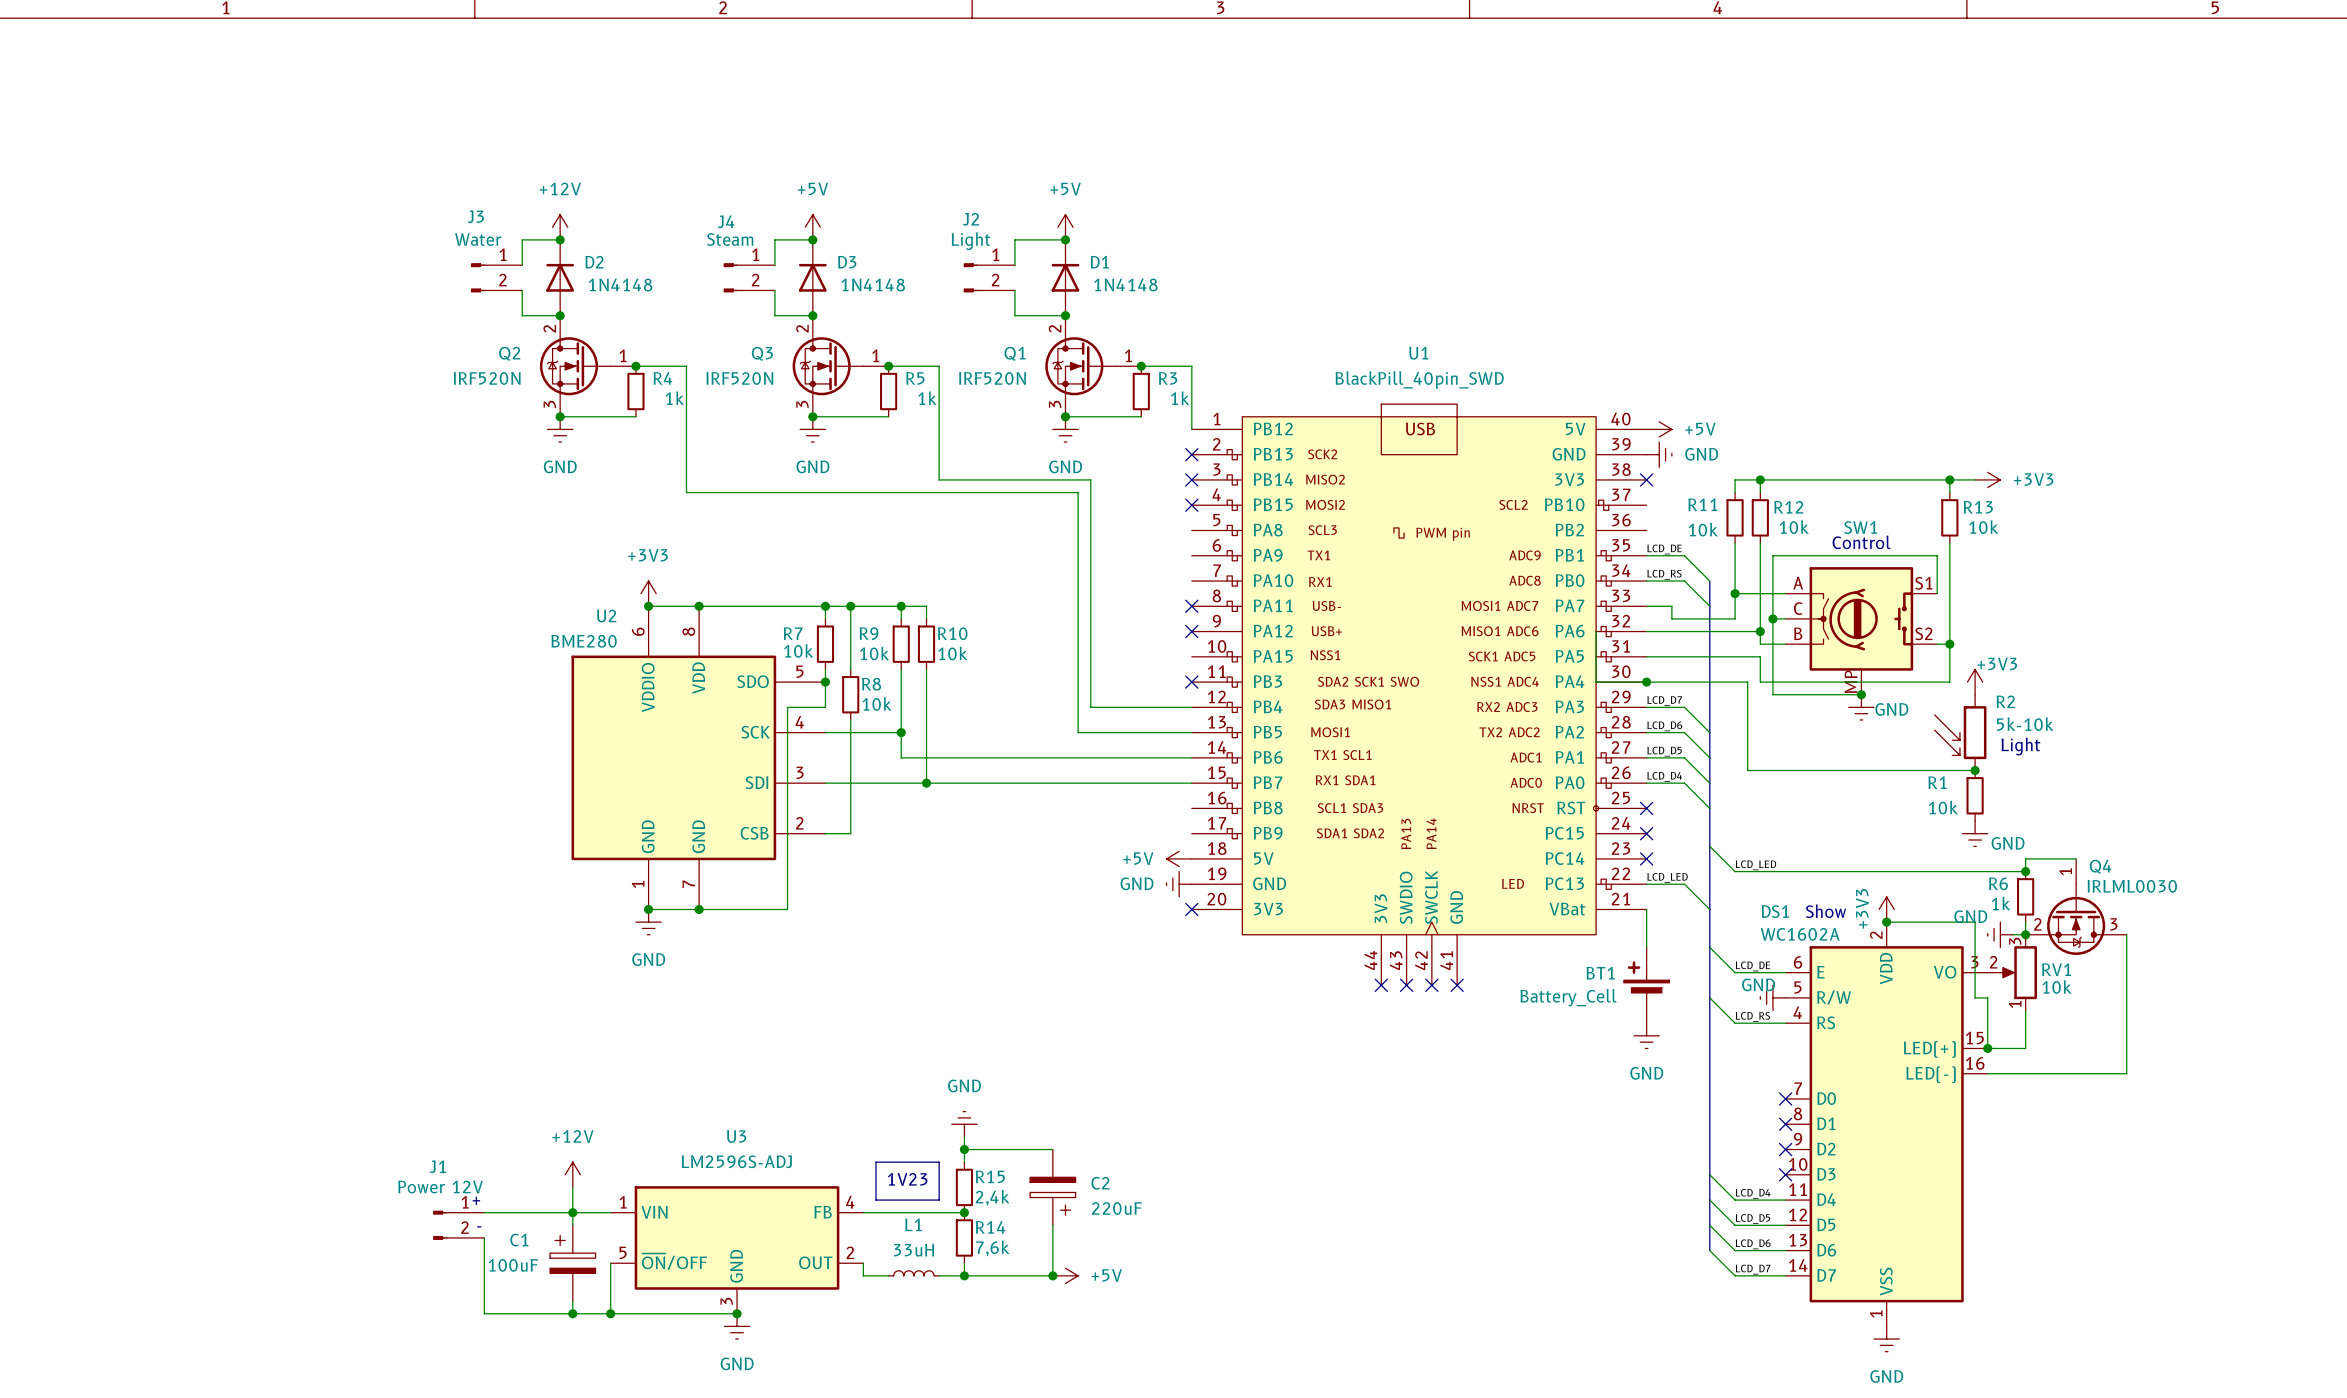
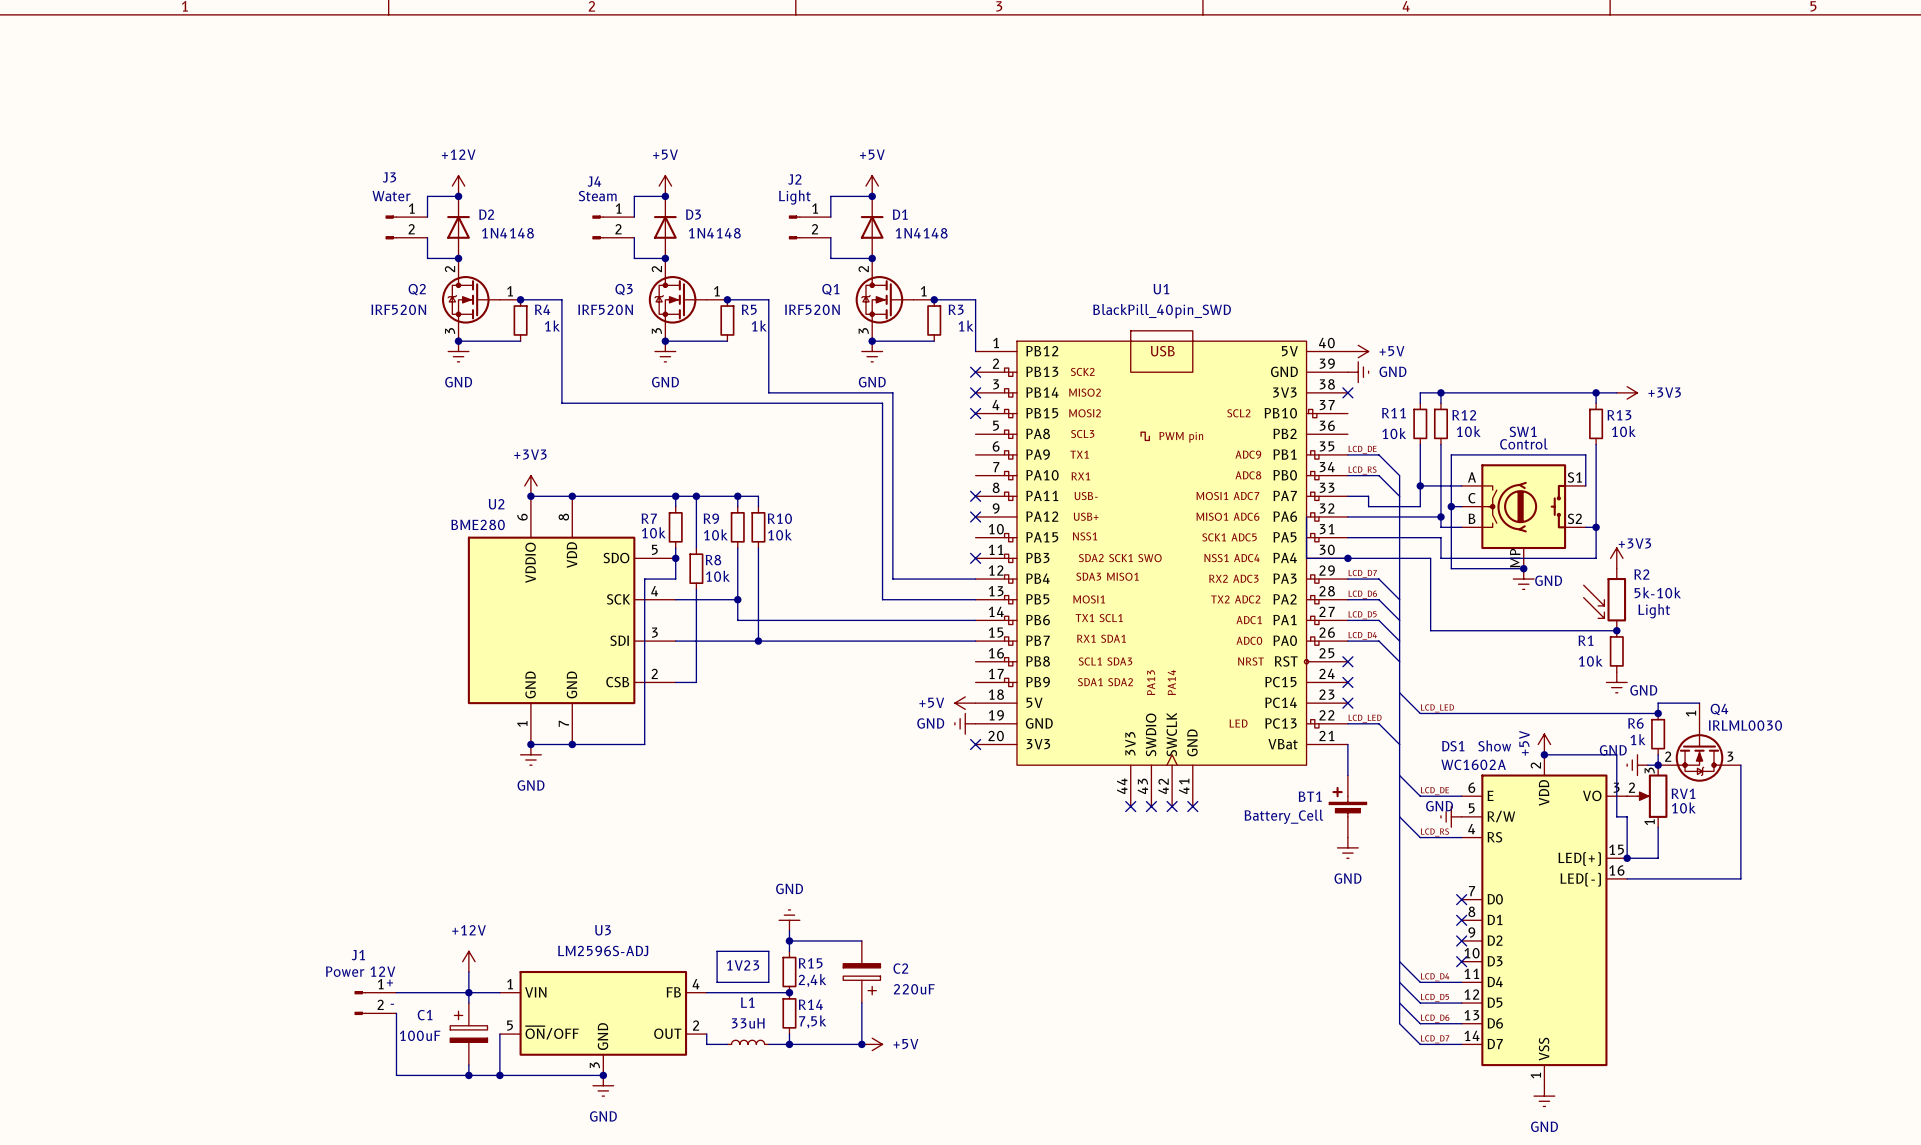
power symbol: +3V3 (1886, 909) -> +5V (1544, 744)
R14 value: 7,6k (992, 1248) -> 7,5k (812, 1021)

